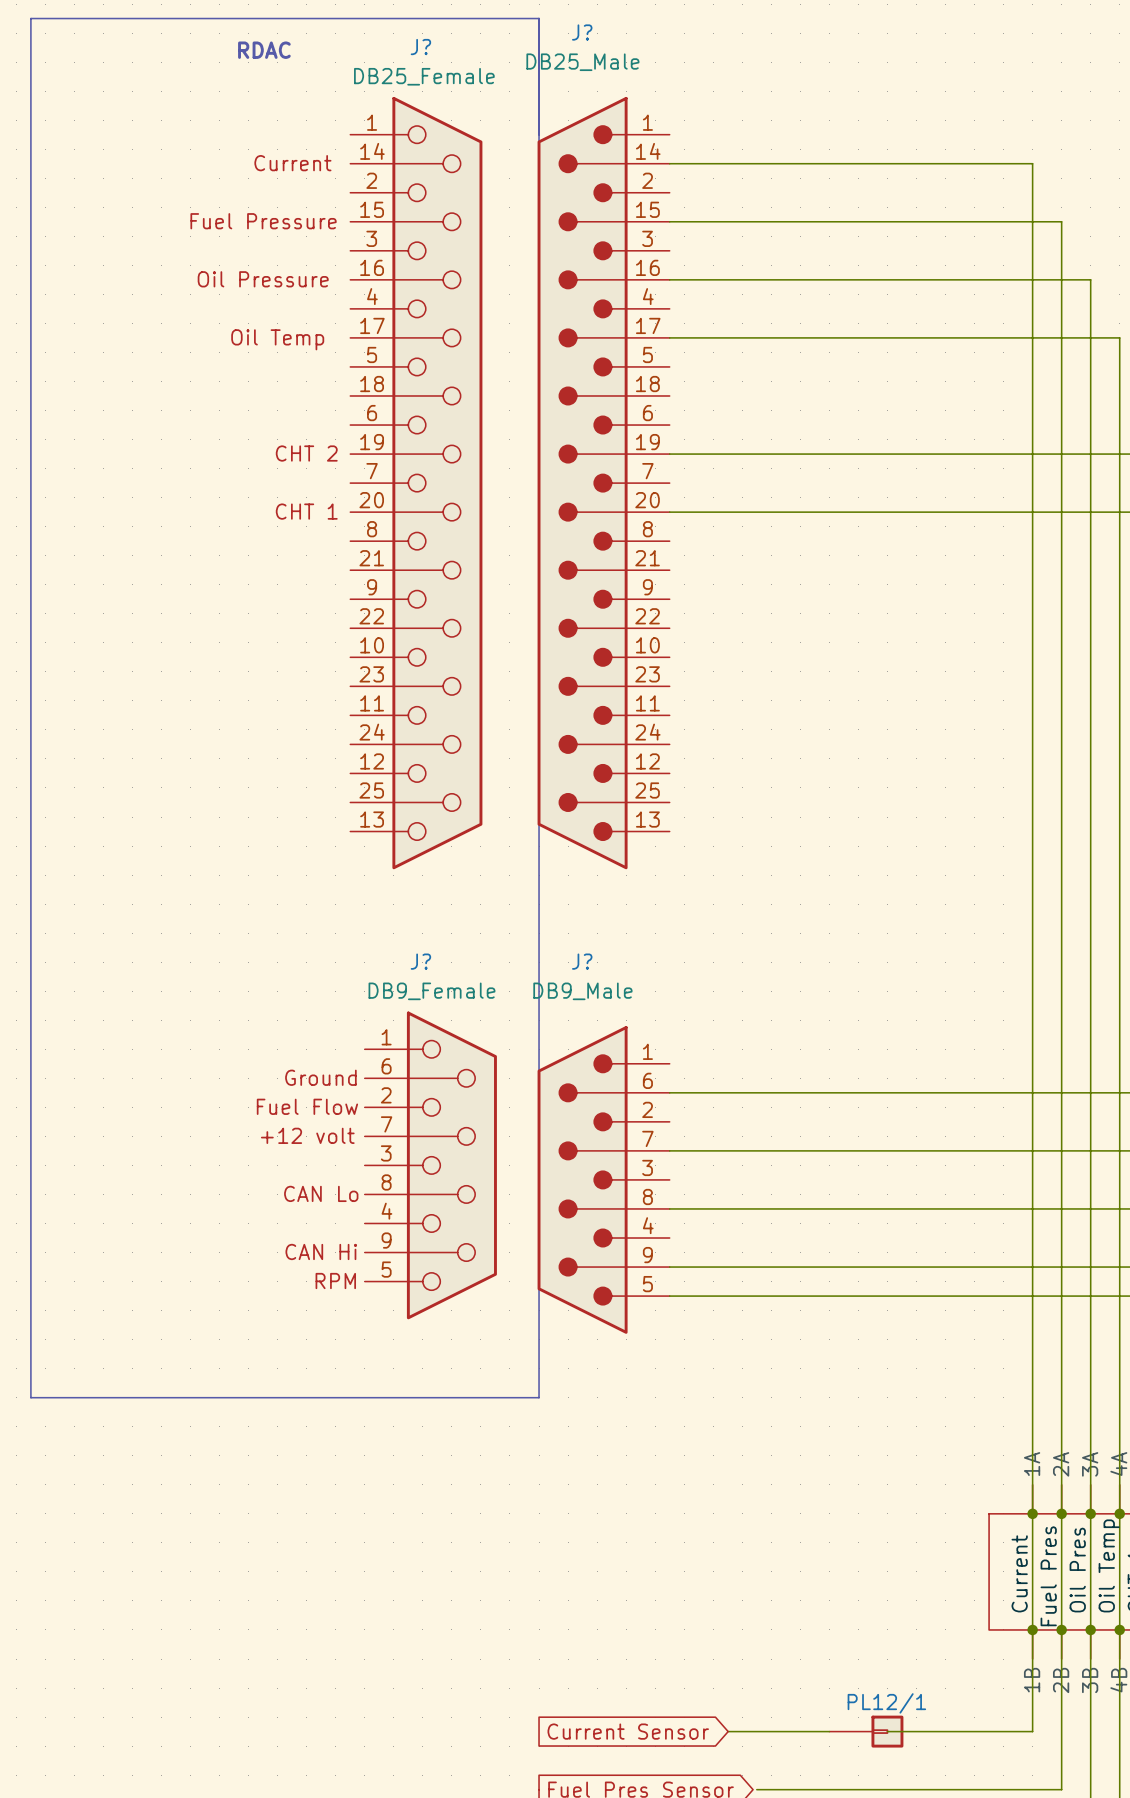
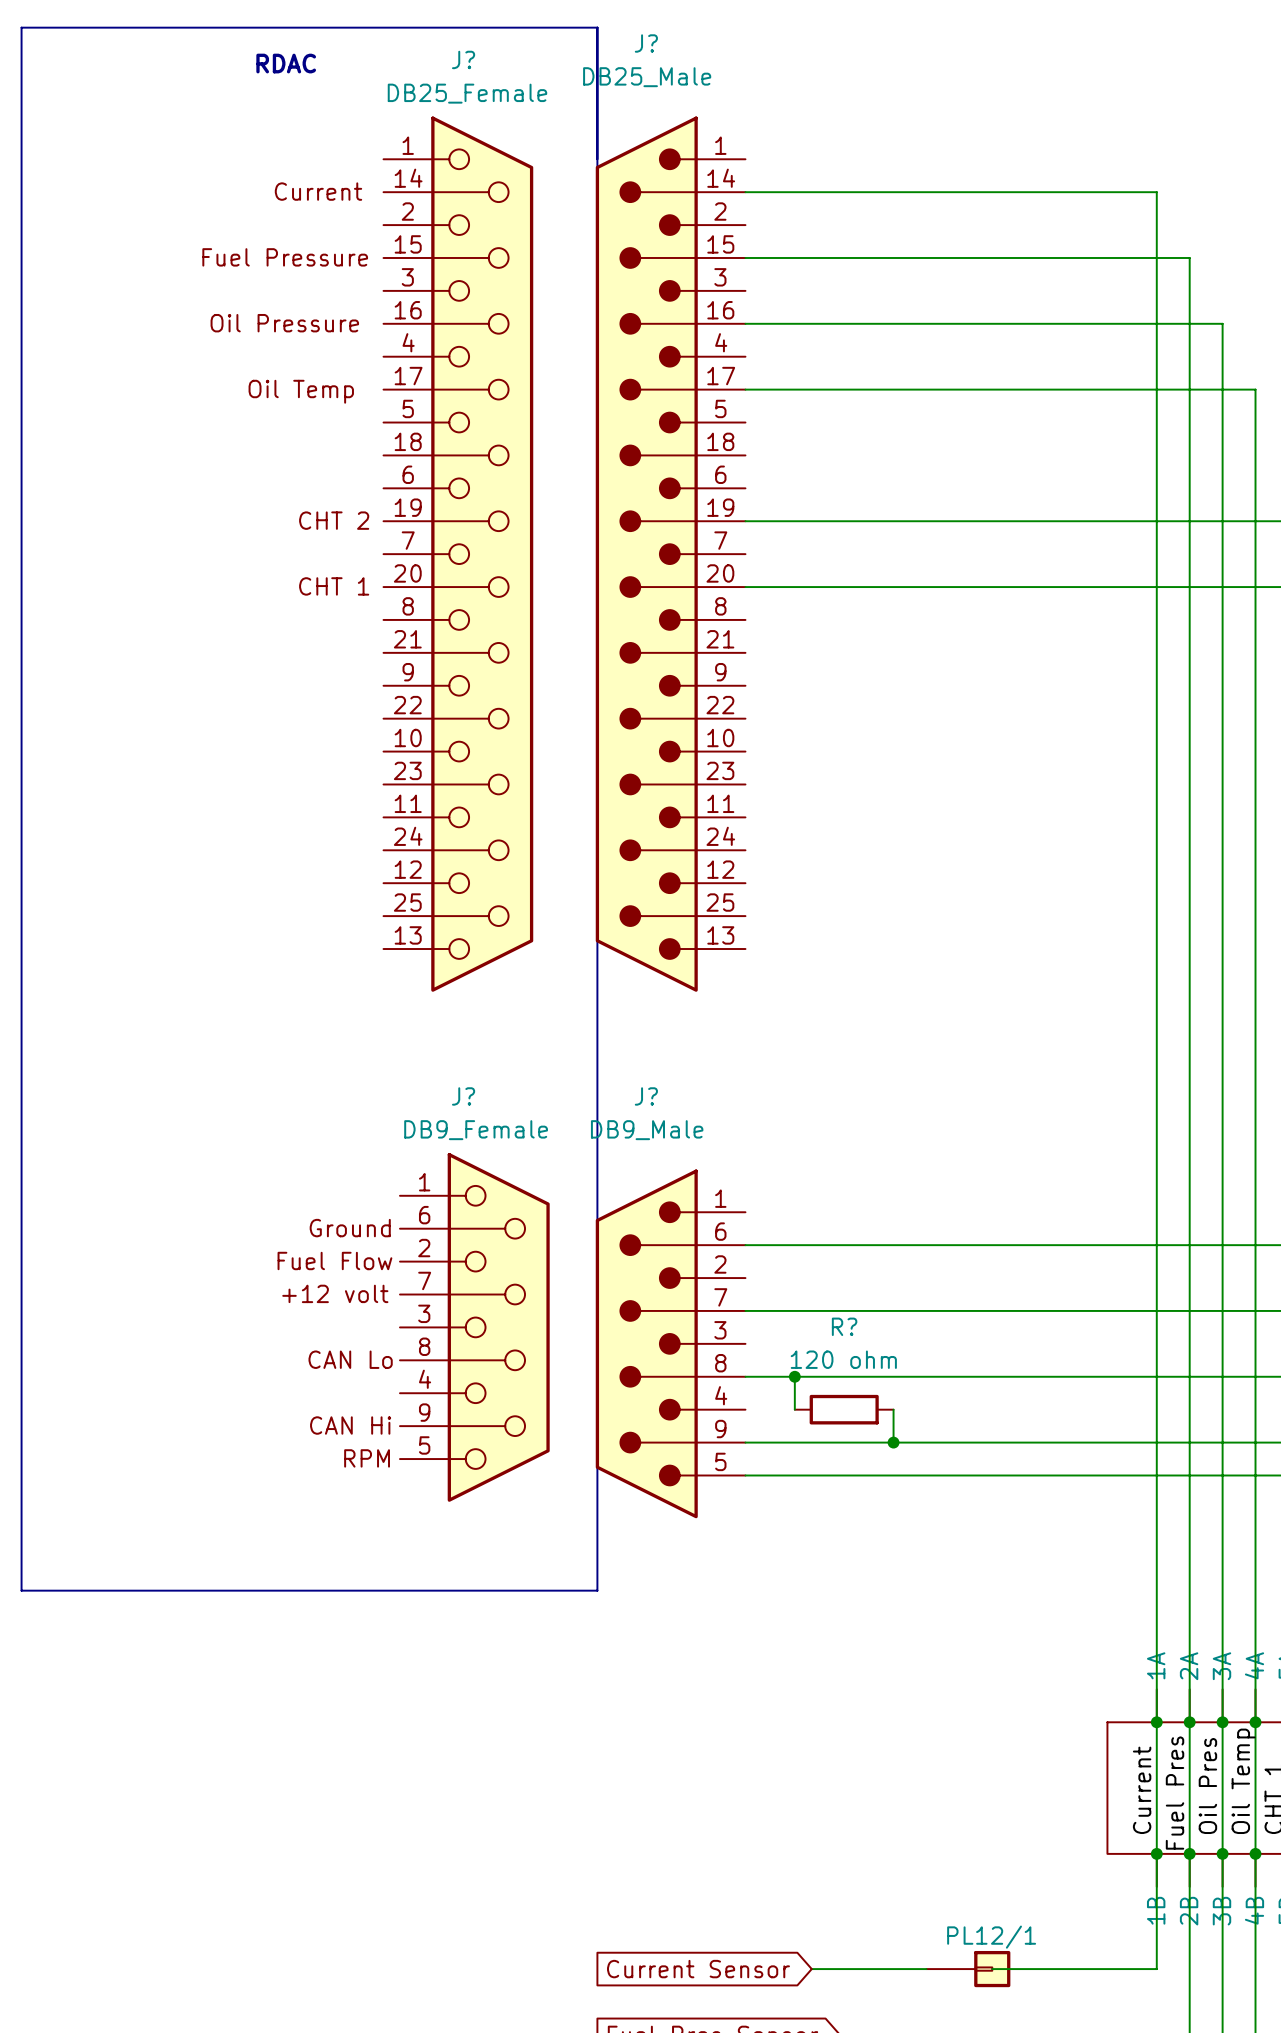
wire: none -> (794, 1376) (794, 1409)
junction: none -> (794, 1376)
R?: none -> 120 ohm (844, 1409)
wire: none -> (893, 1409) (893, 1442)
junction: none -> (893, 1442)

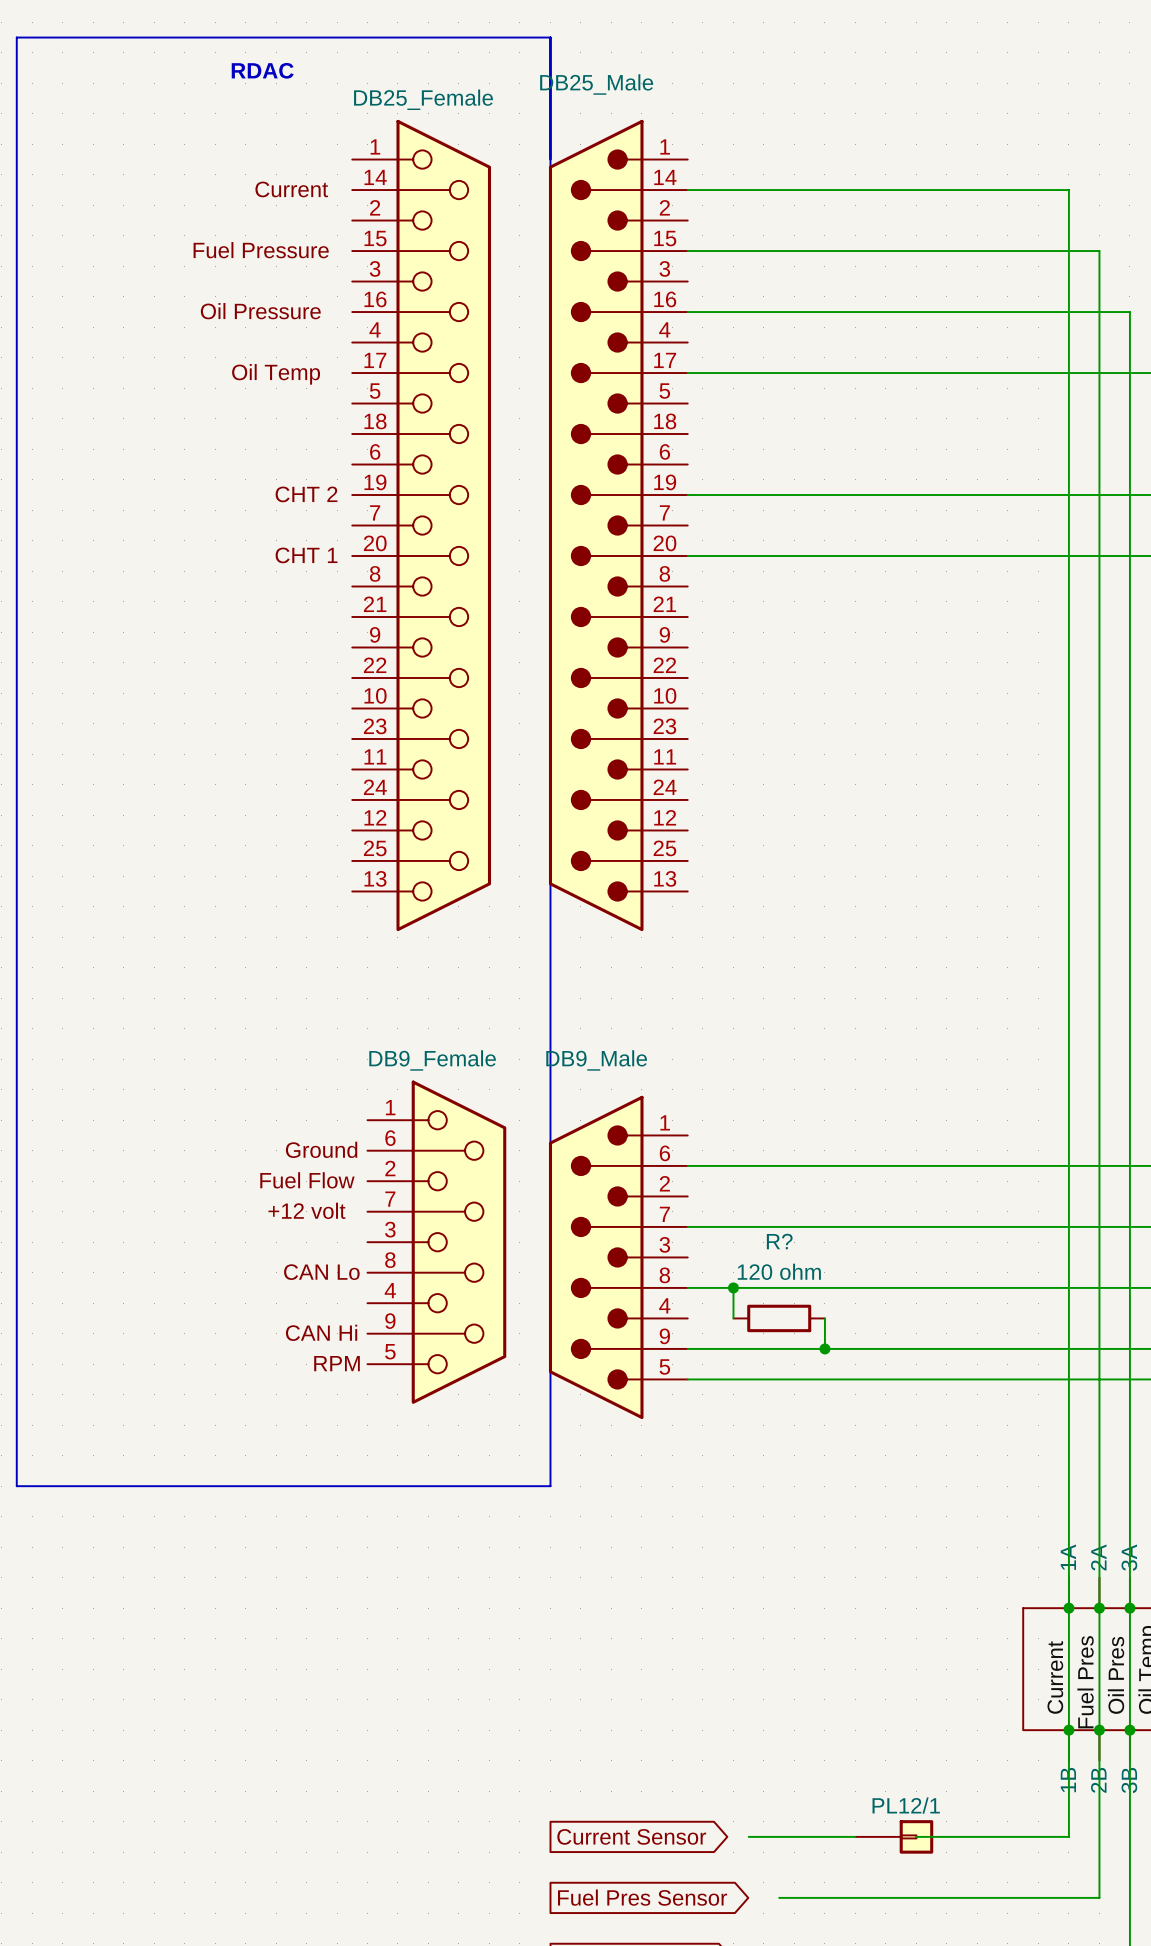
J? name: J? (646, 43) -> none
J? name: J? (463, 59) -> none
J? name: J? (463, 1096) -> none
J? name: J? (646, 1096) -> none

